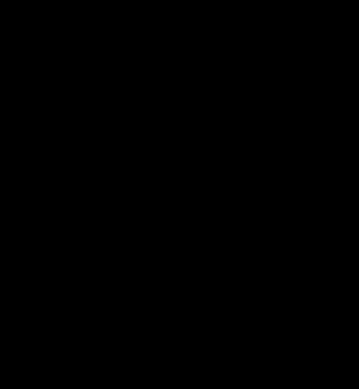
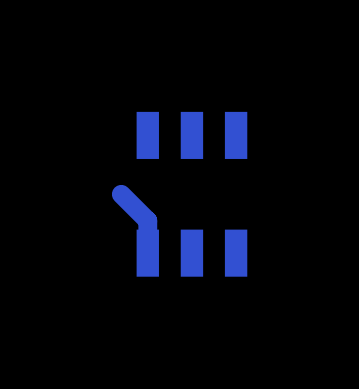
bottom track: none -> (121, 194) (147, 220) (147, 253)
part: none -> (191, 194)

